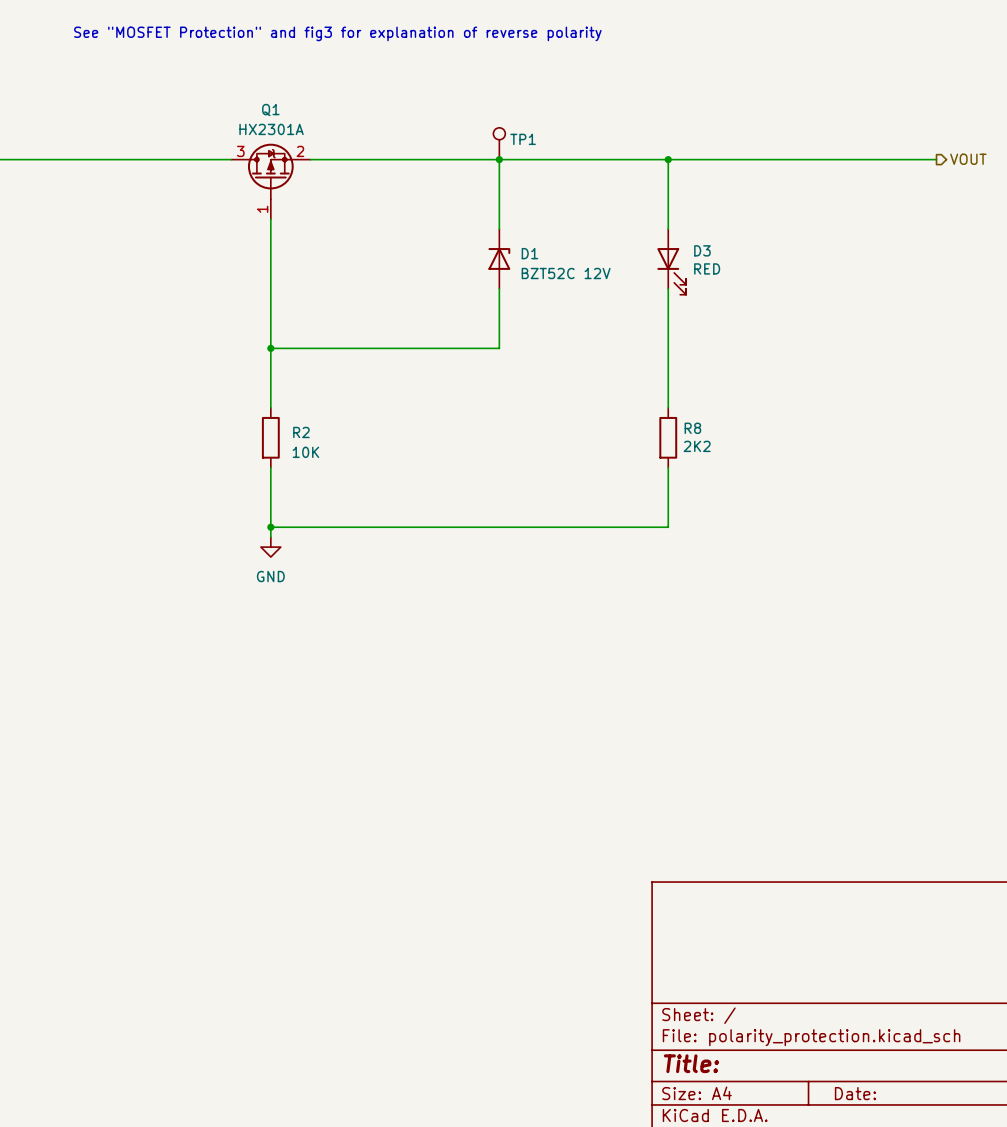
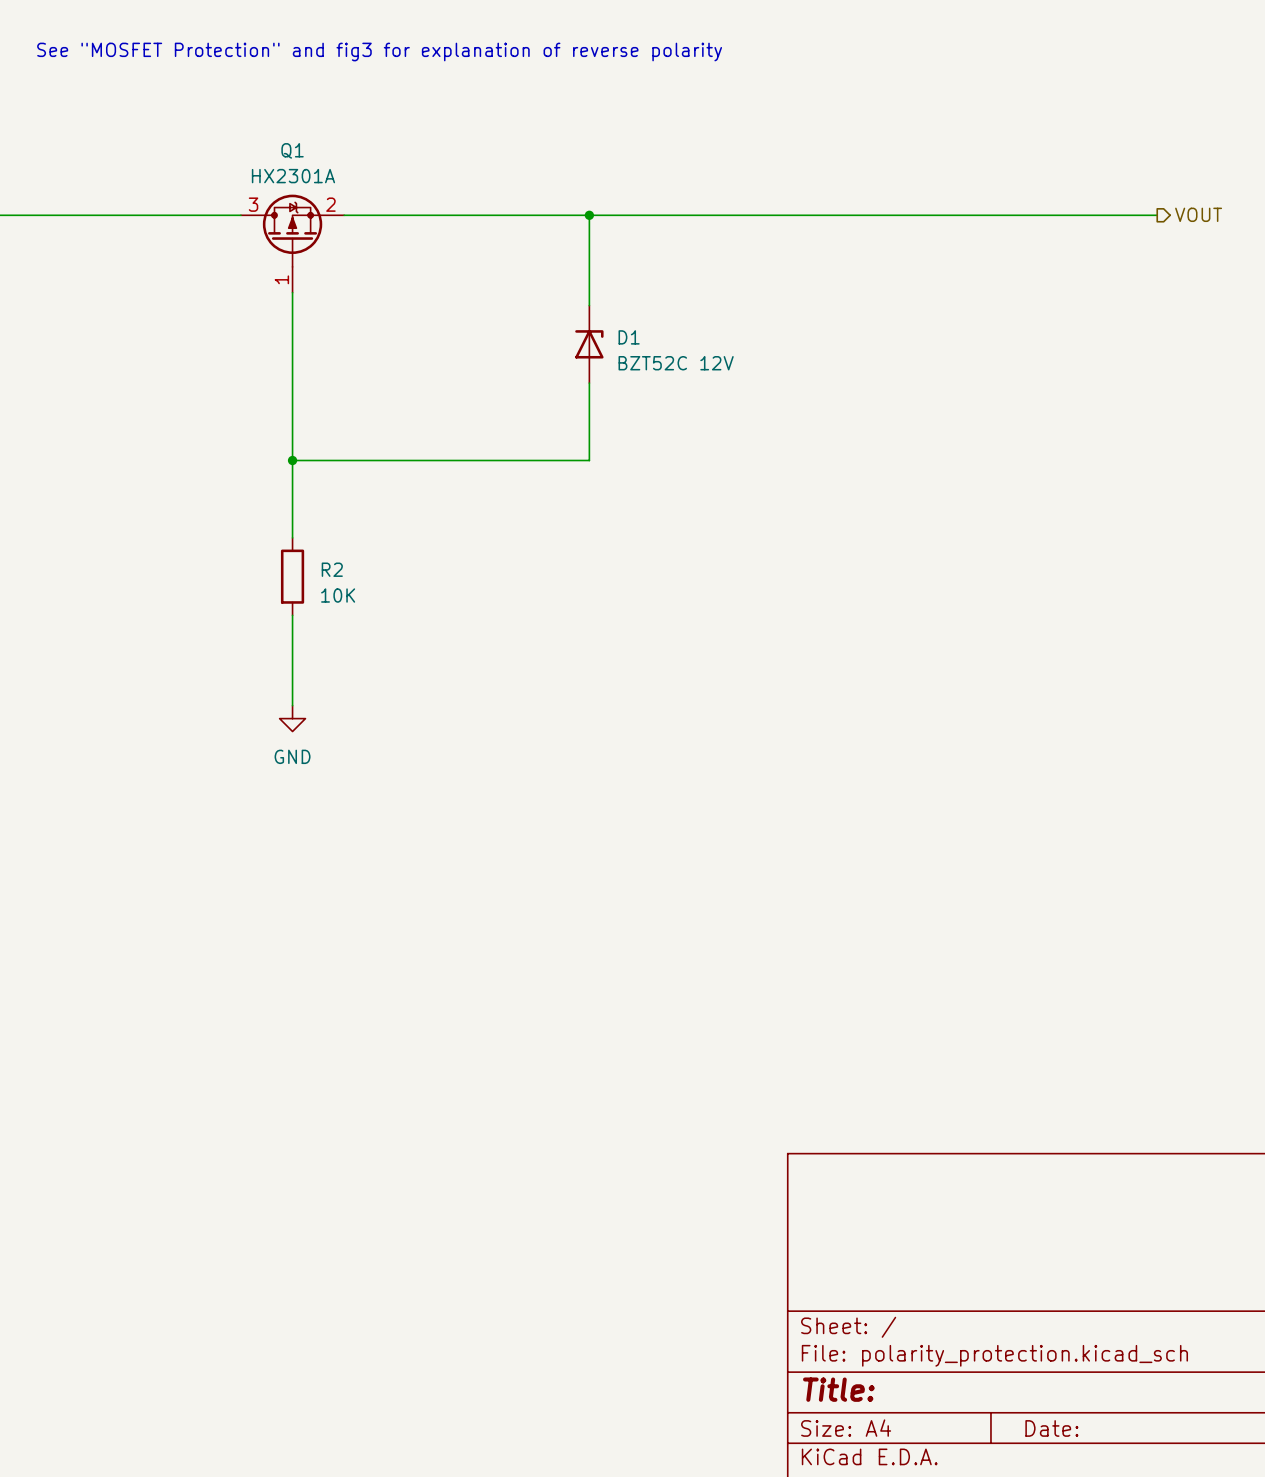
TP1: (499, 143) -> none
wire: (668, 159) (668, 229) -> none
junction: (668, 159) -> none
D3: RED (671, 261) -> none
wire: (668, 288) (668, 408) -> none
R8: 2K2 (668, 437) -> none
wire: (668, 467) (668, 527) (270, 527) -> none
junction: (270, 527) -> none

